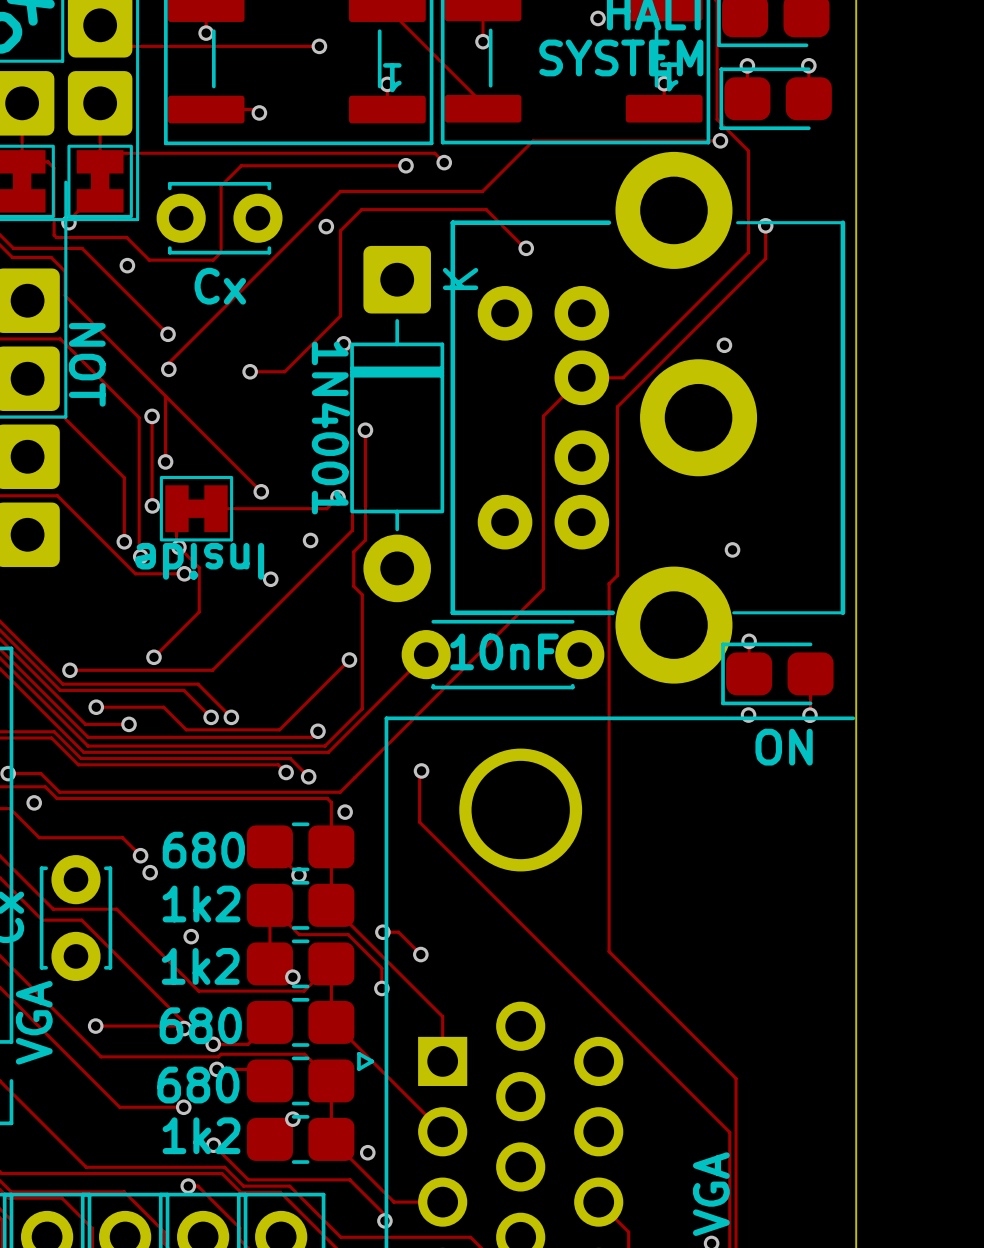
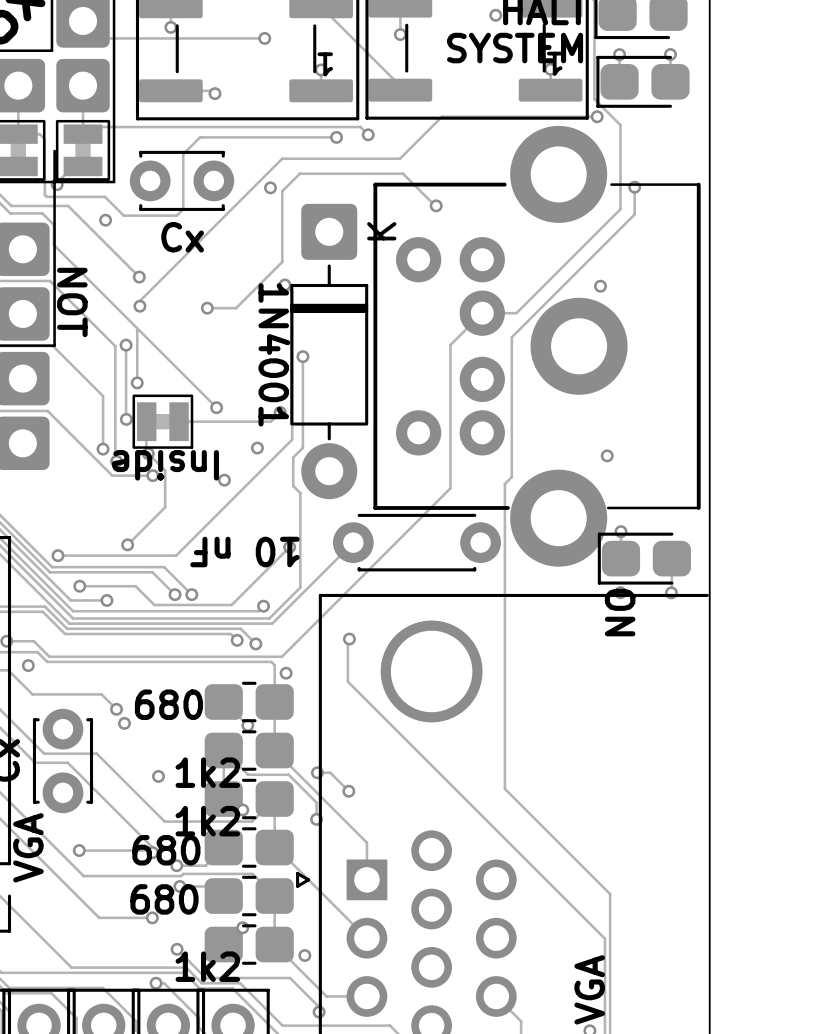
part value: 10nF (504, 651) -> 10 nF (244, 552)
part value rotation: 0° (784, 747) -> 90° clockwise (620, 612)
part value position: 1k2 (201, 904) -> 1k2 (207, 772)
part value position: 1k2 (200, 966) -> 1k2 (207, 821)
part value position: 1k2 (201, 1135) -> 1k2 (207, 966)

